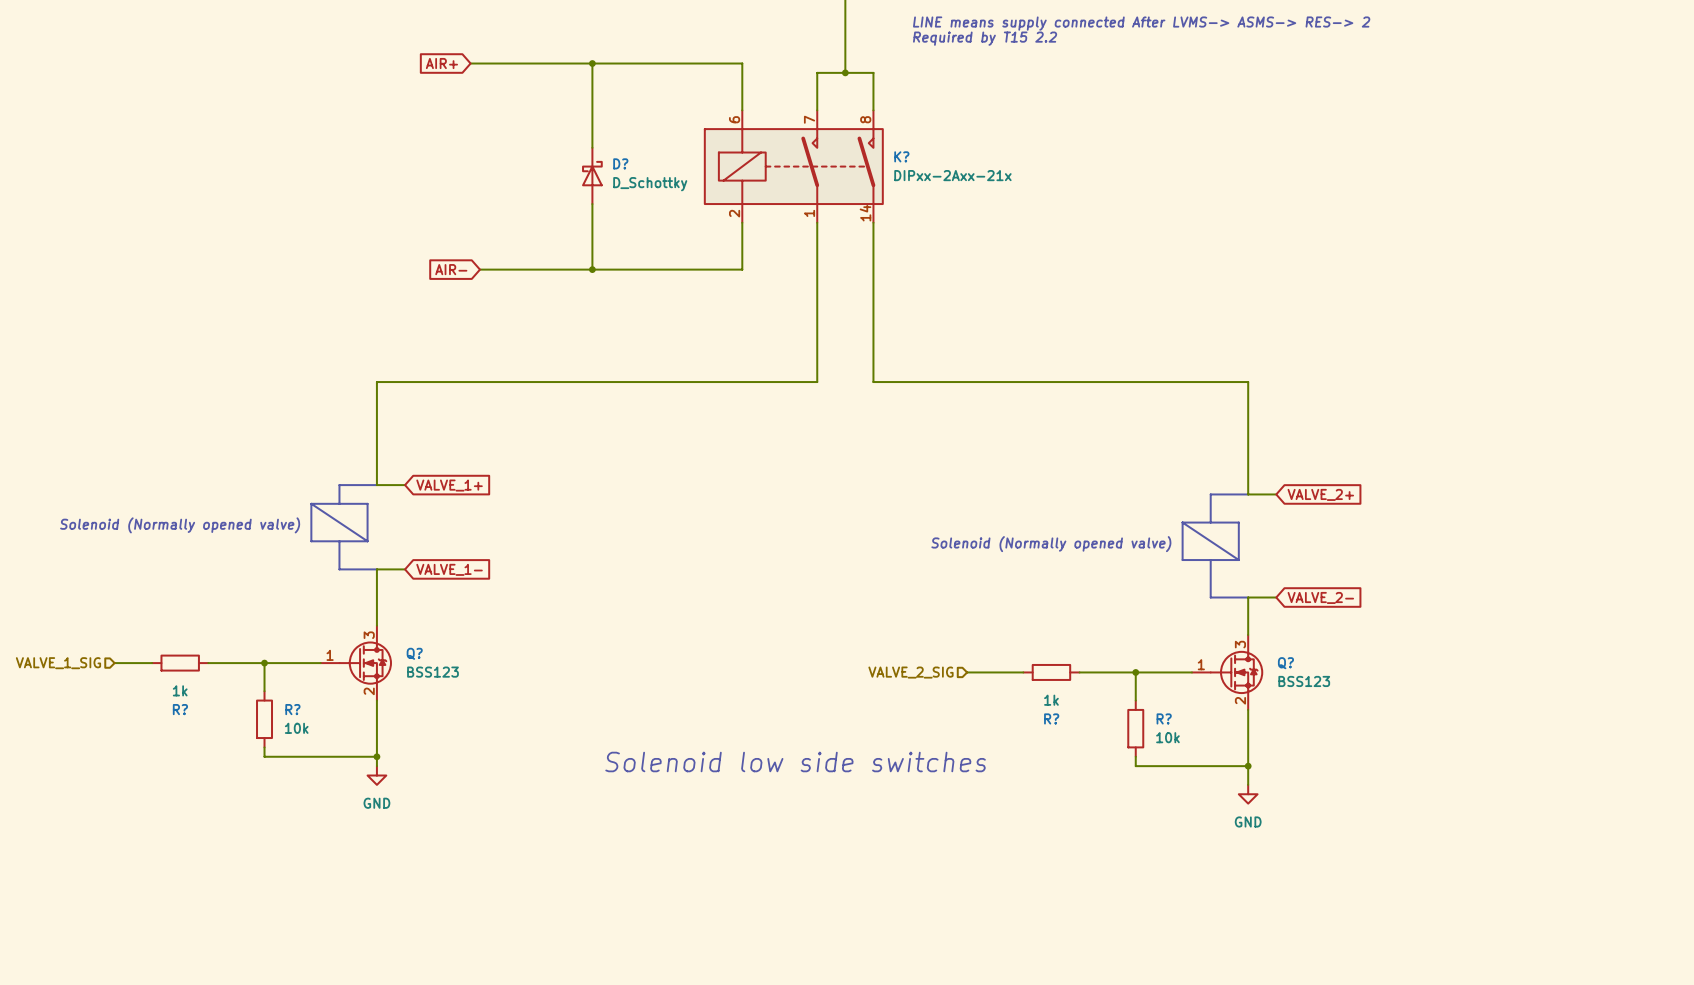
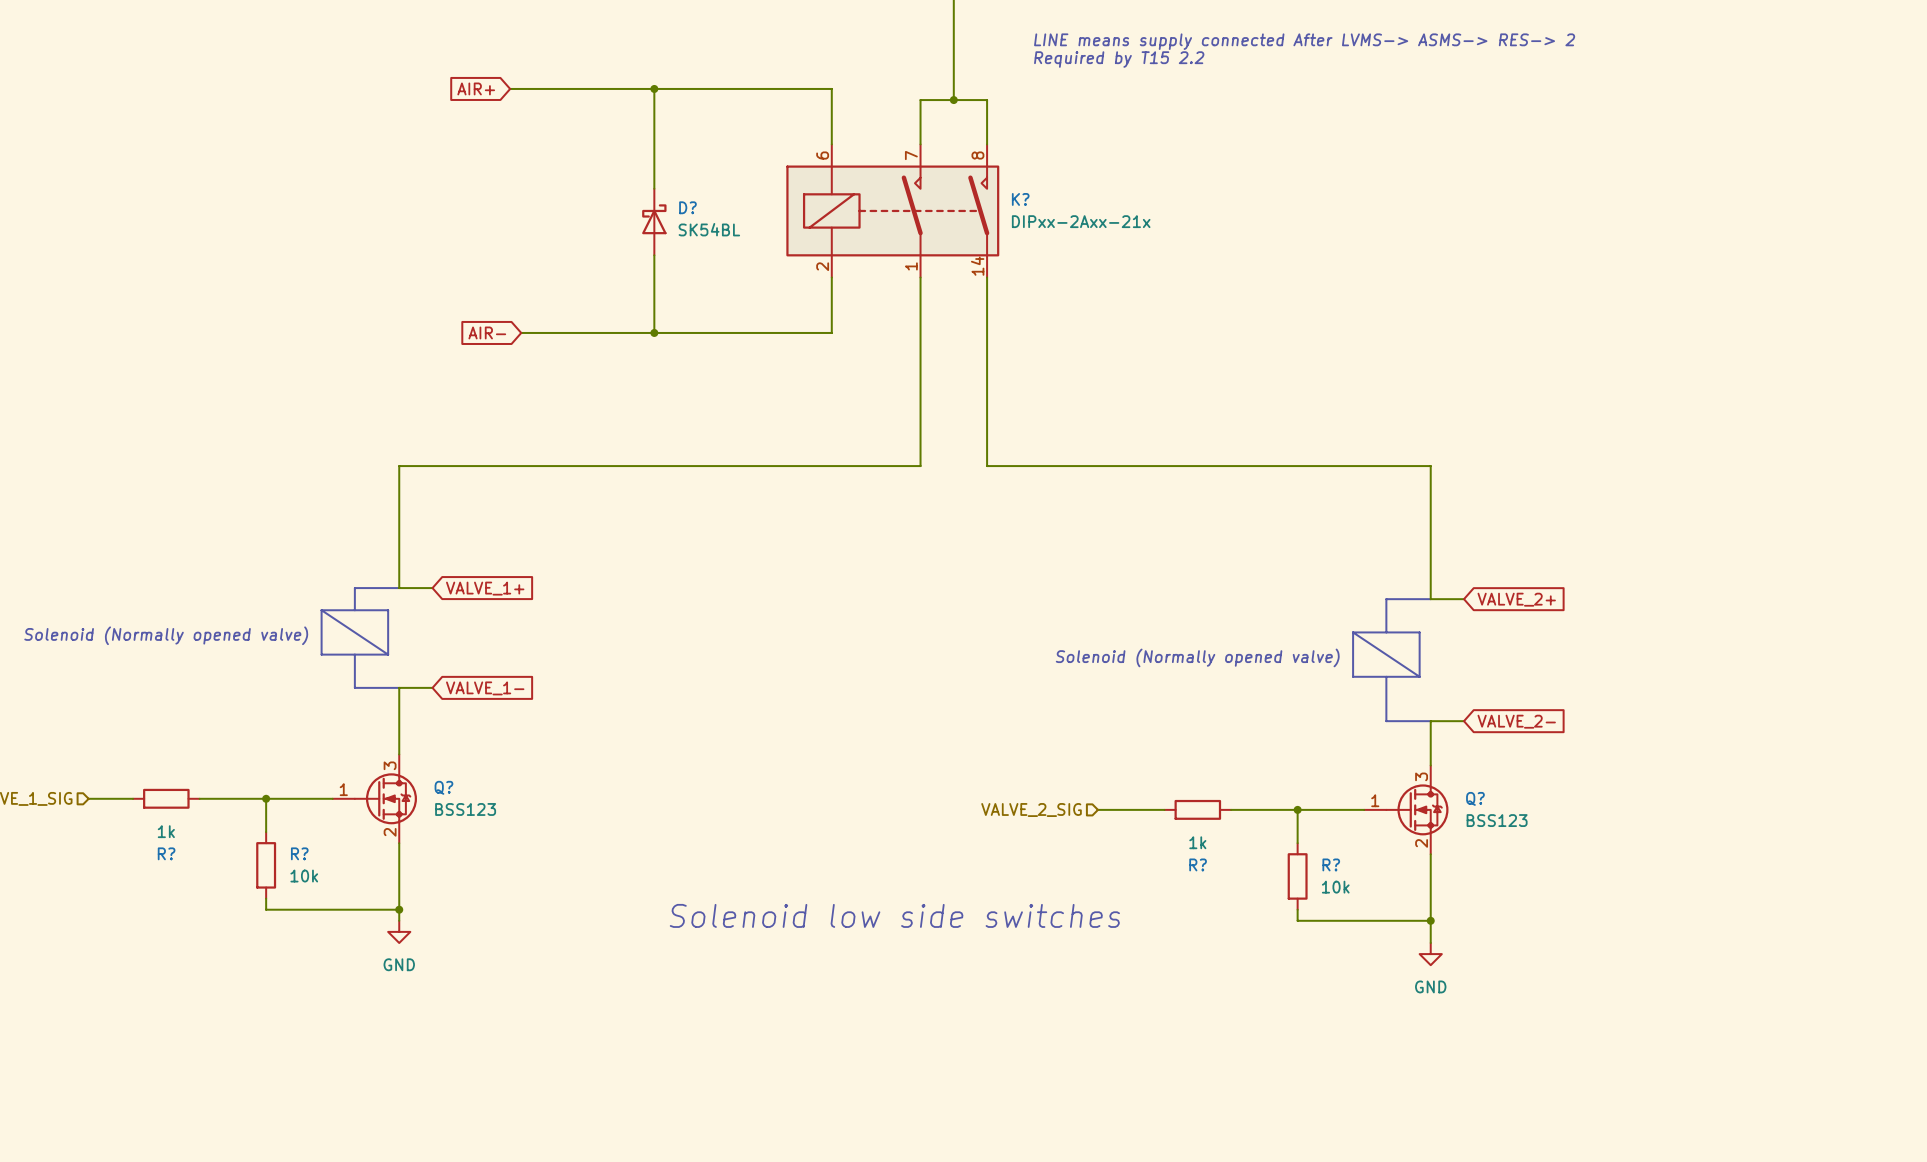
D? value: D_Schottky (650, 184) -> SK54BL (709, 229)

